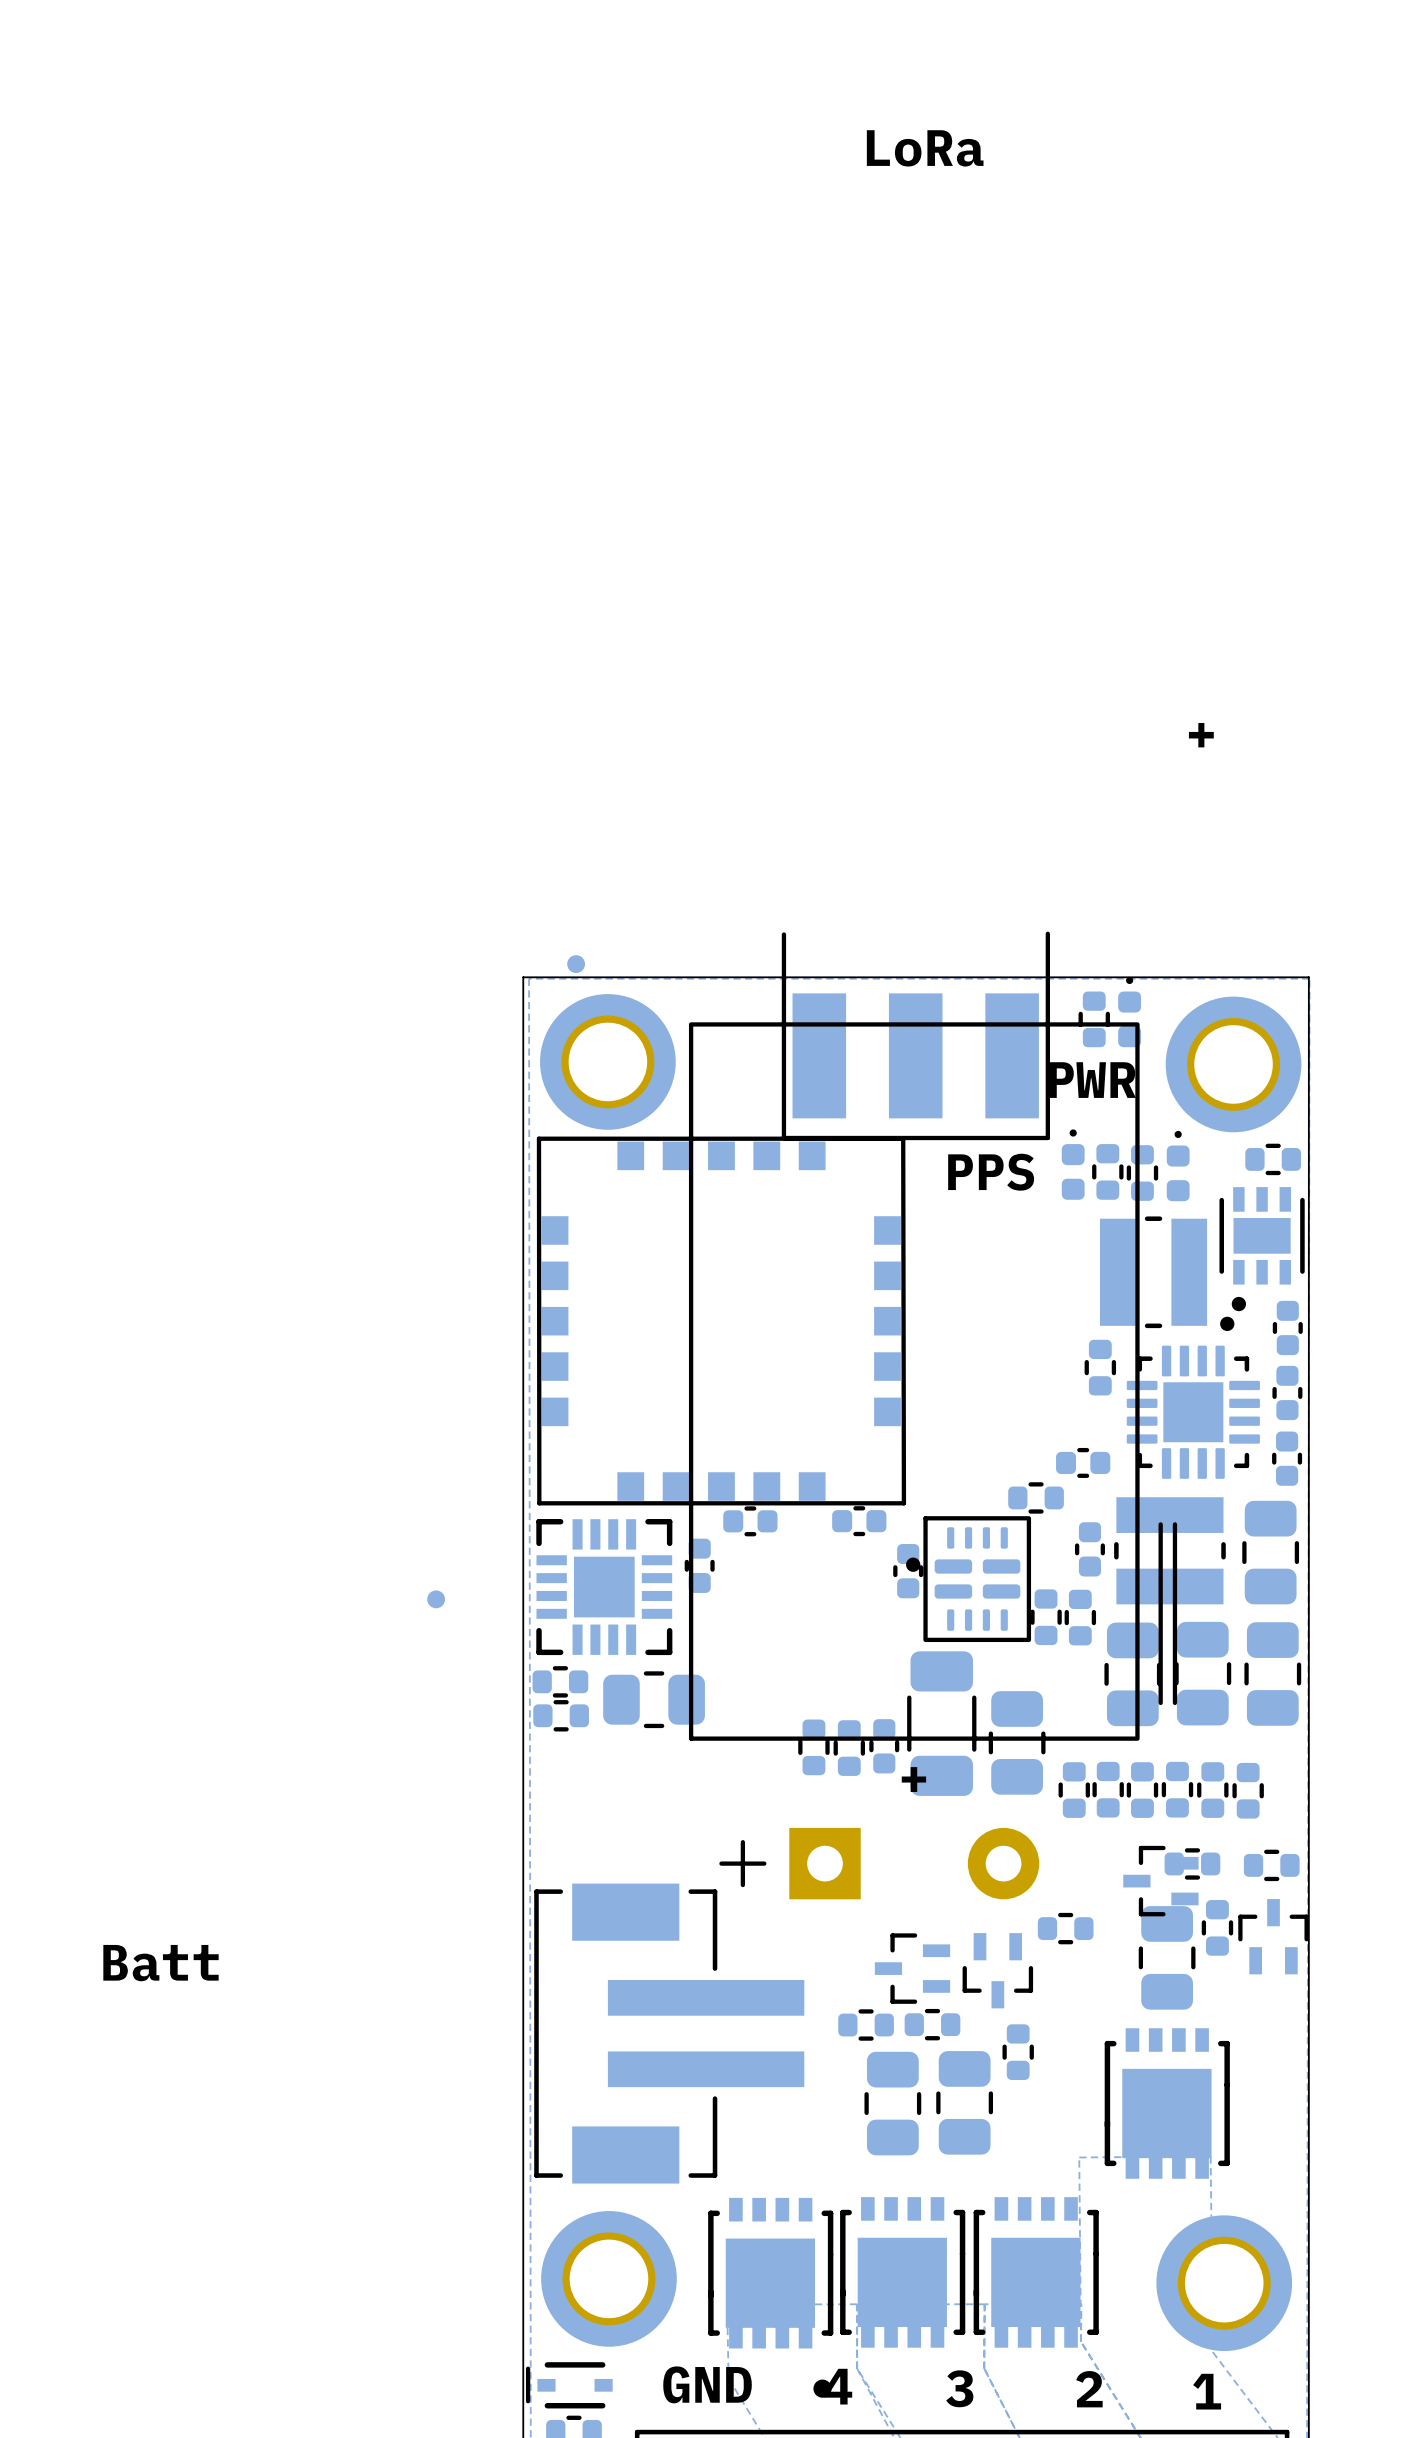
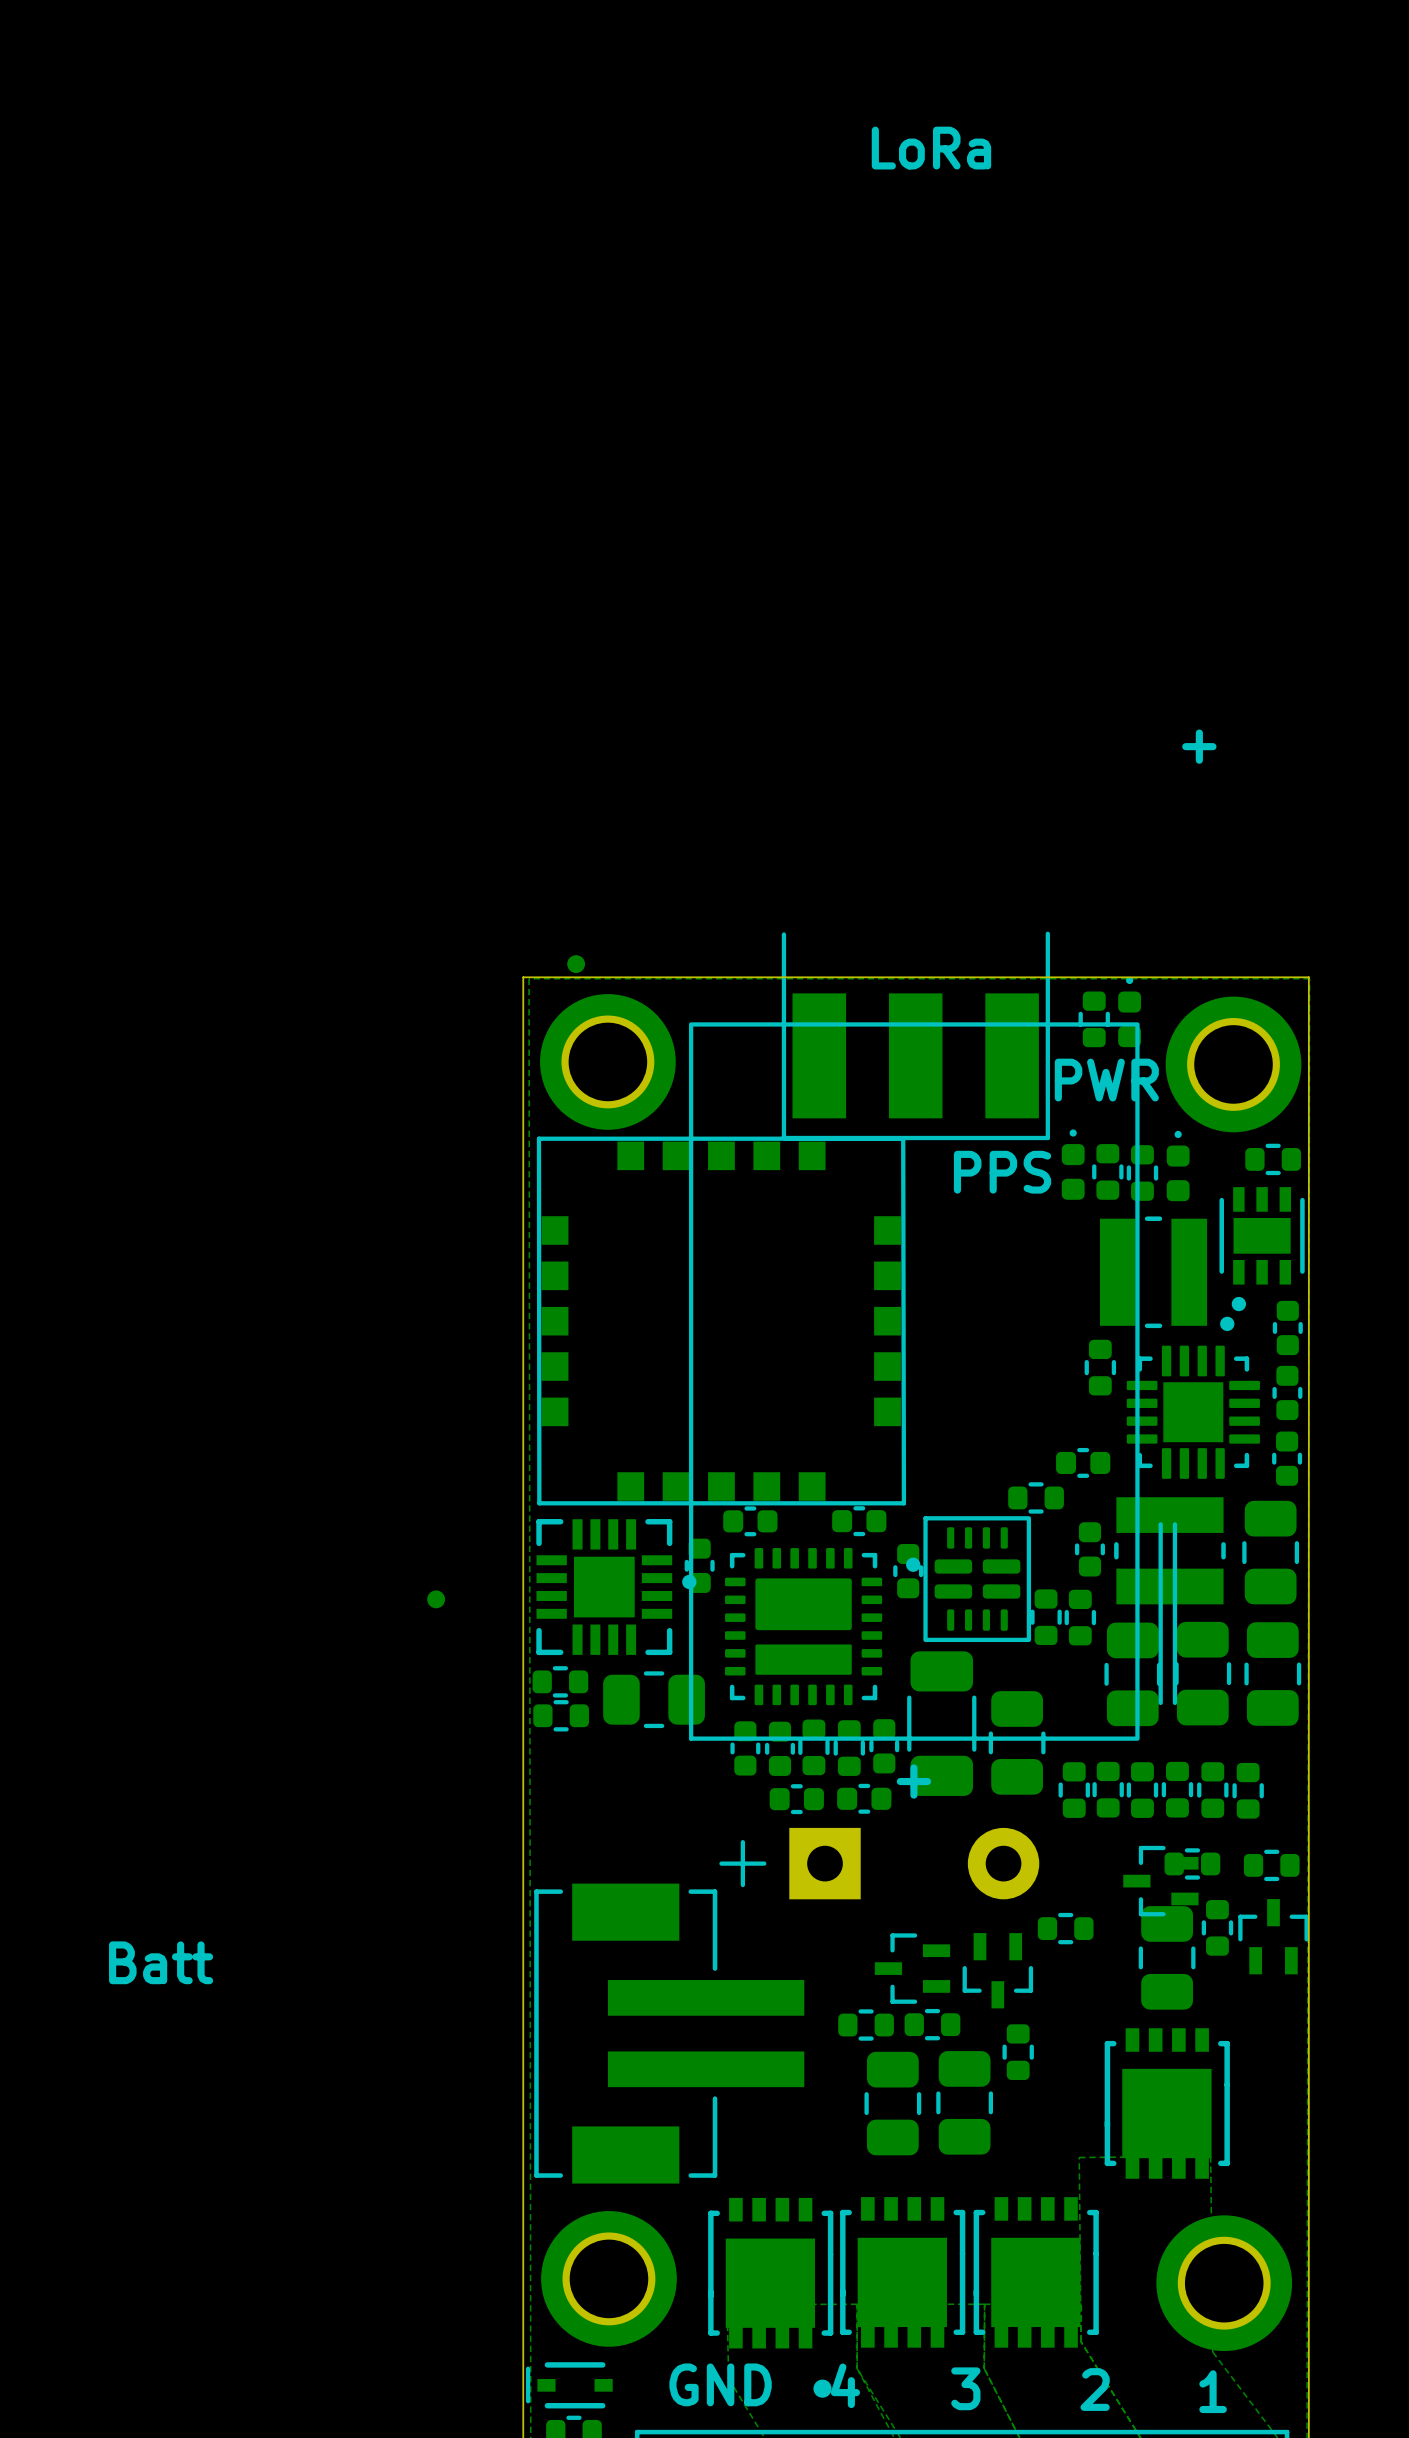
part: none -> (782, 1626)
part: none -> (745, 1748)
part: none -> (780, 1748)
part: none -> (864, 1798)
part: none -> (796, 1799)

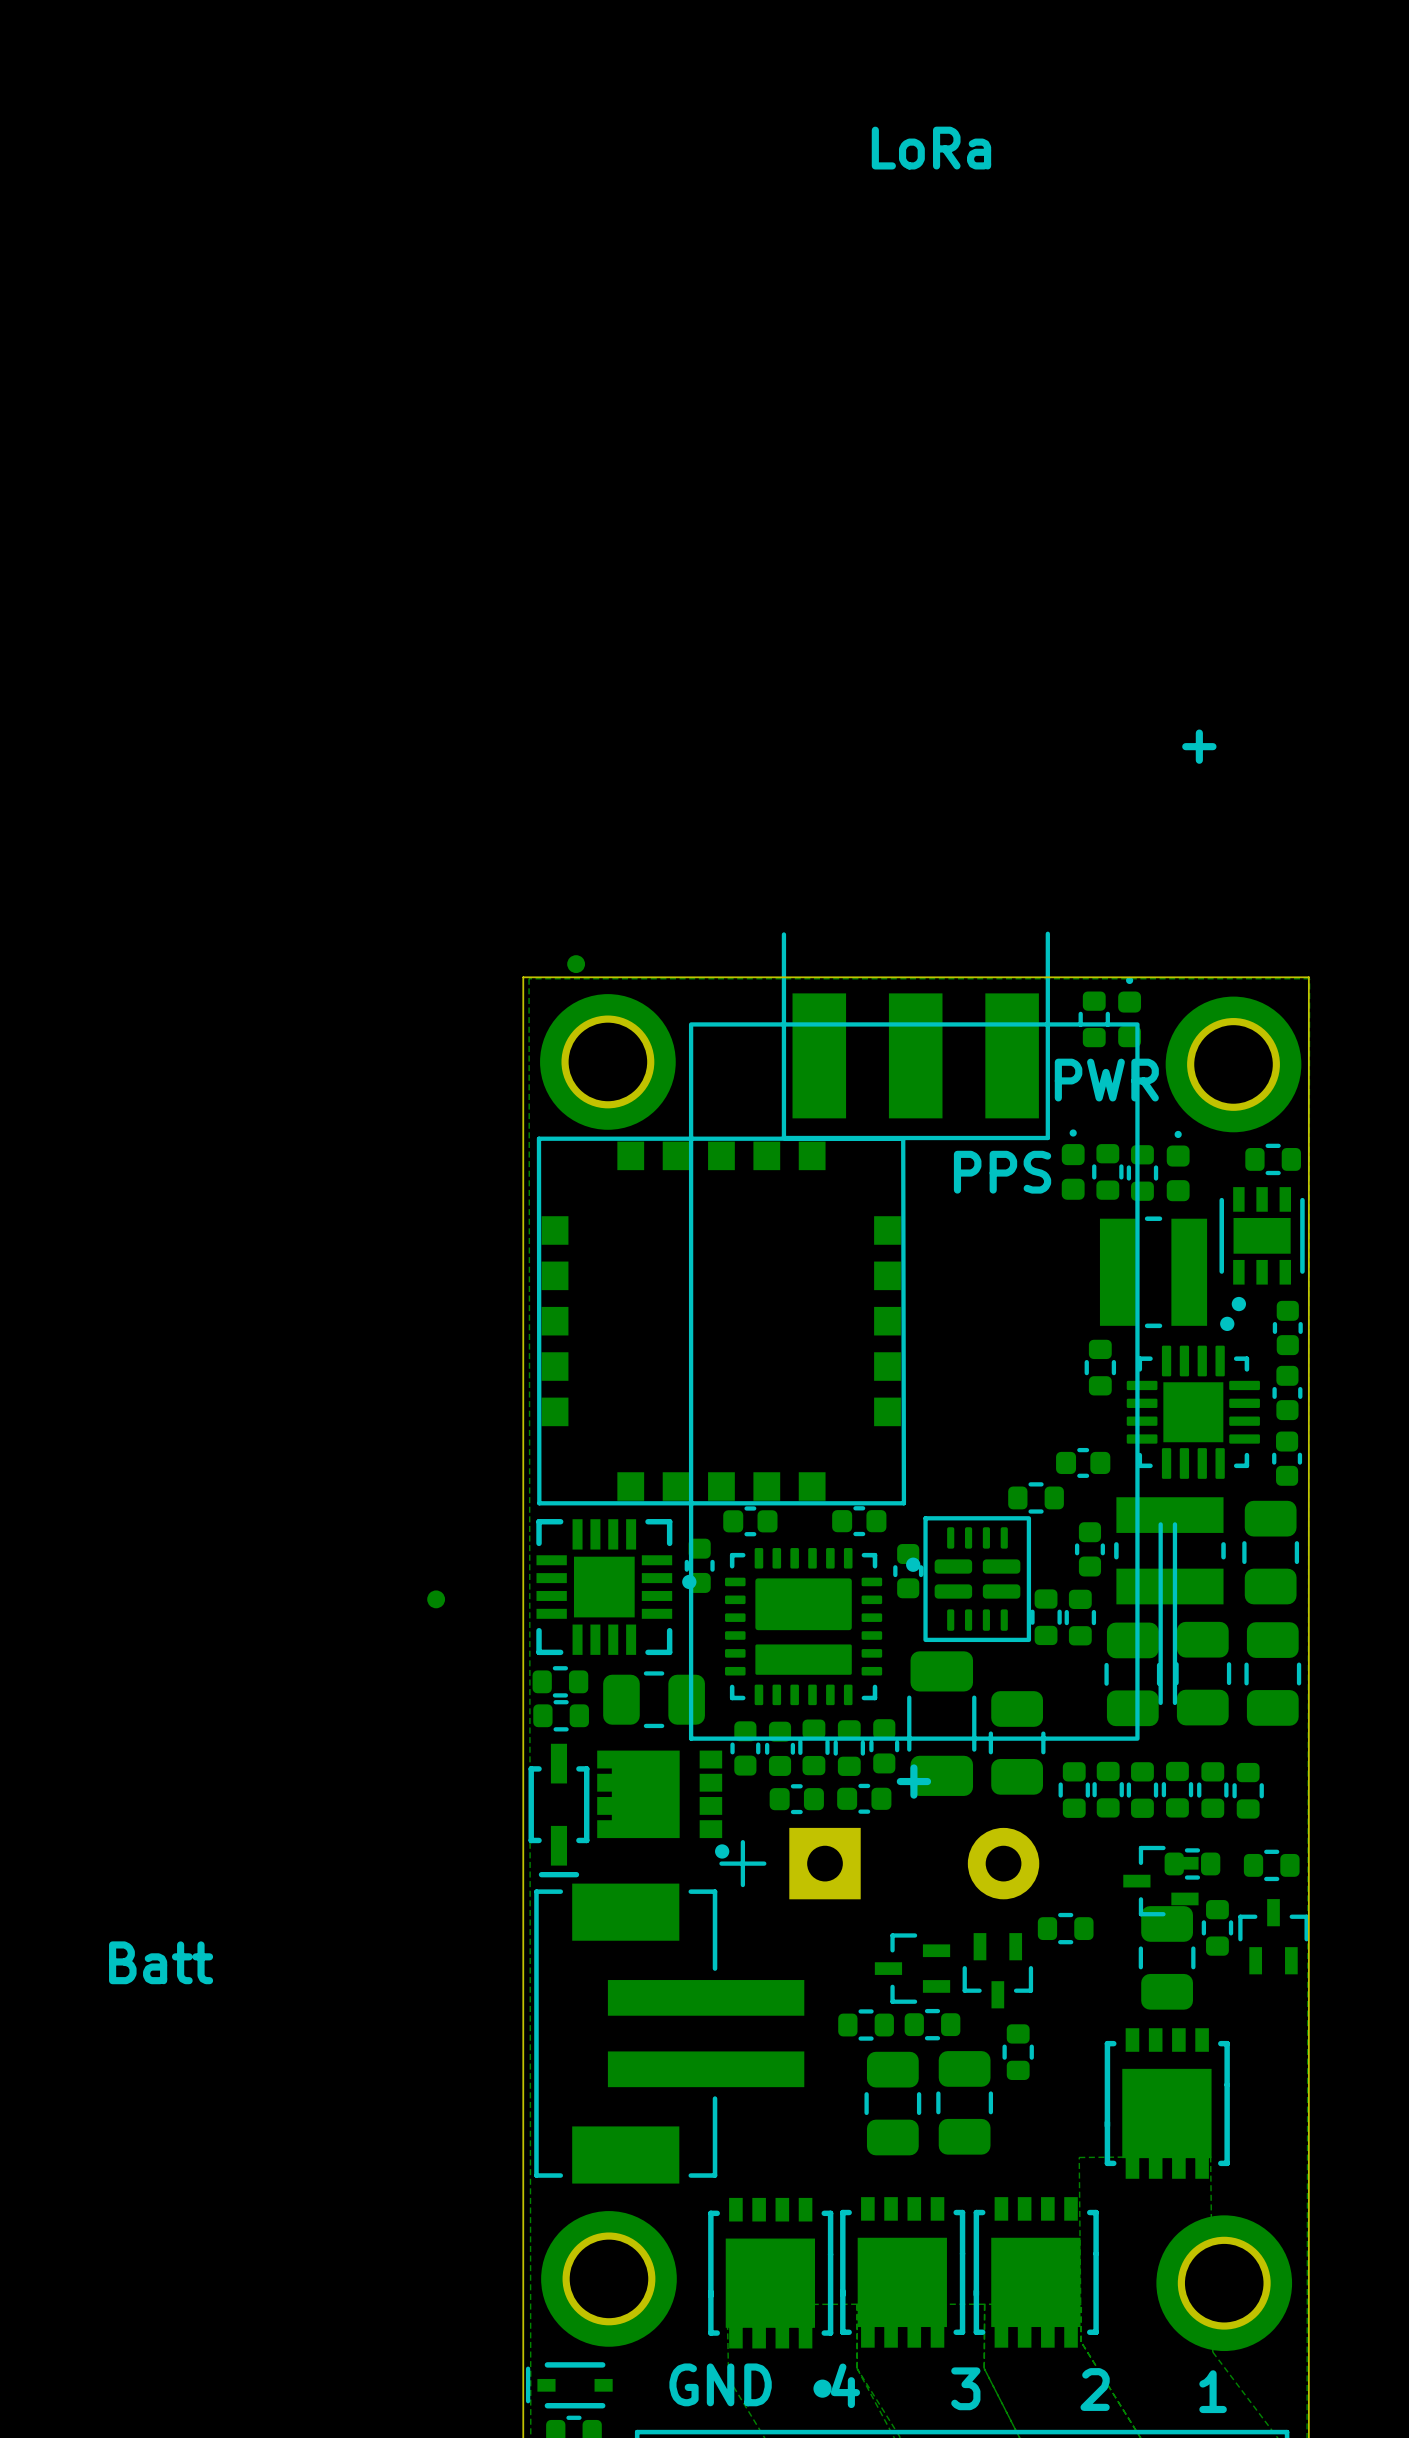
part: none -> (663, 1804)
part: none -> (558, 1810)

